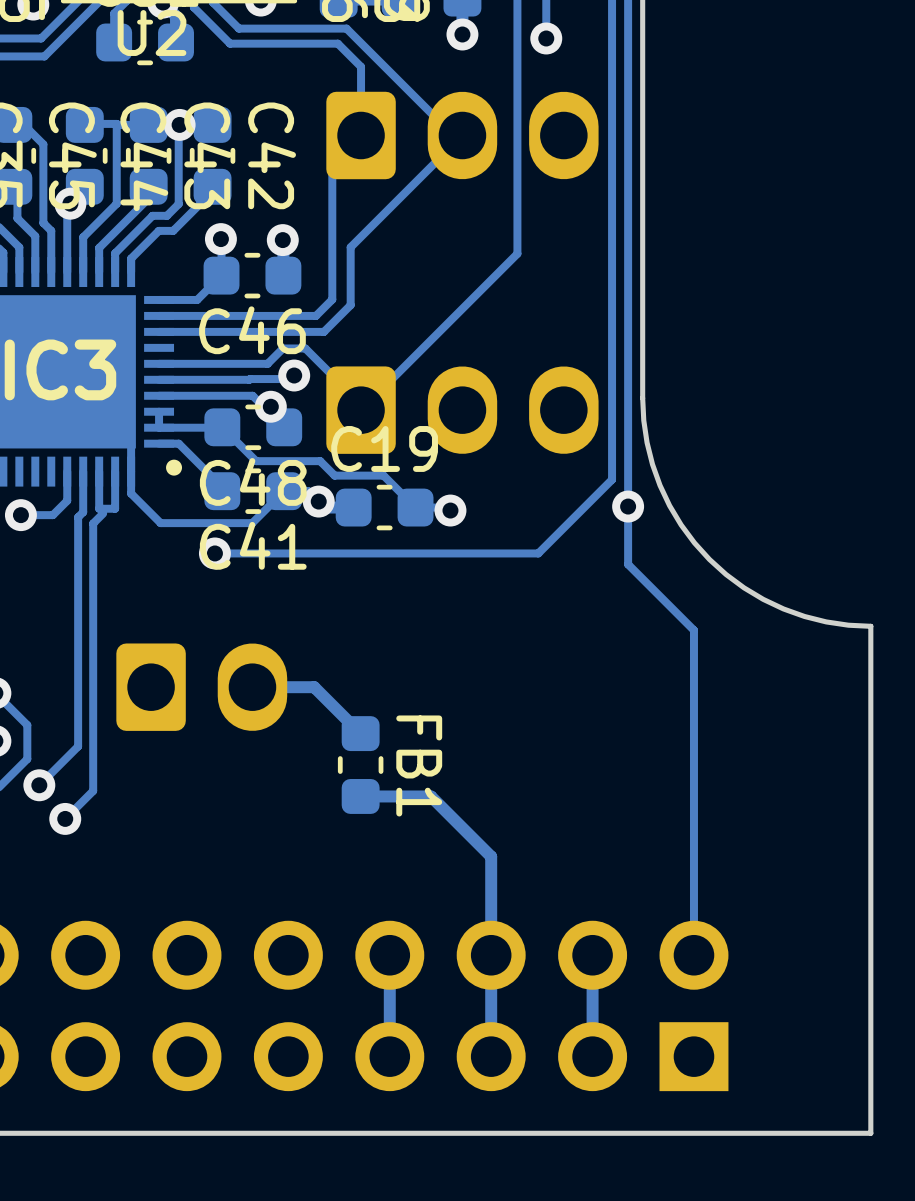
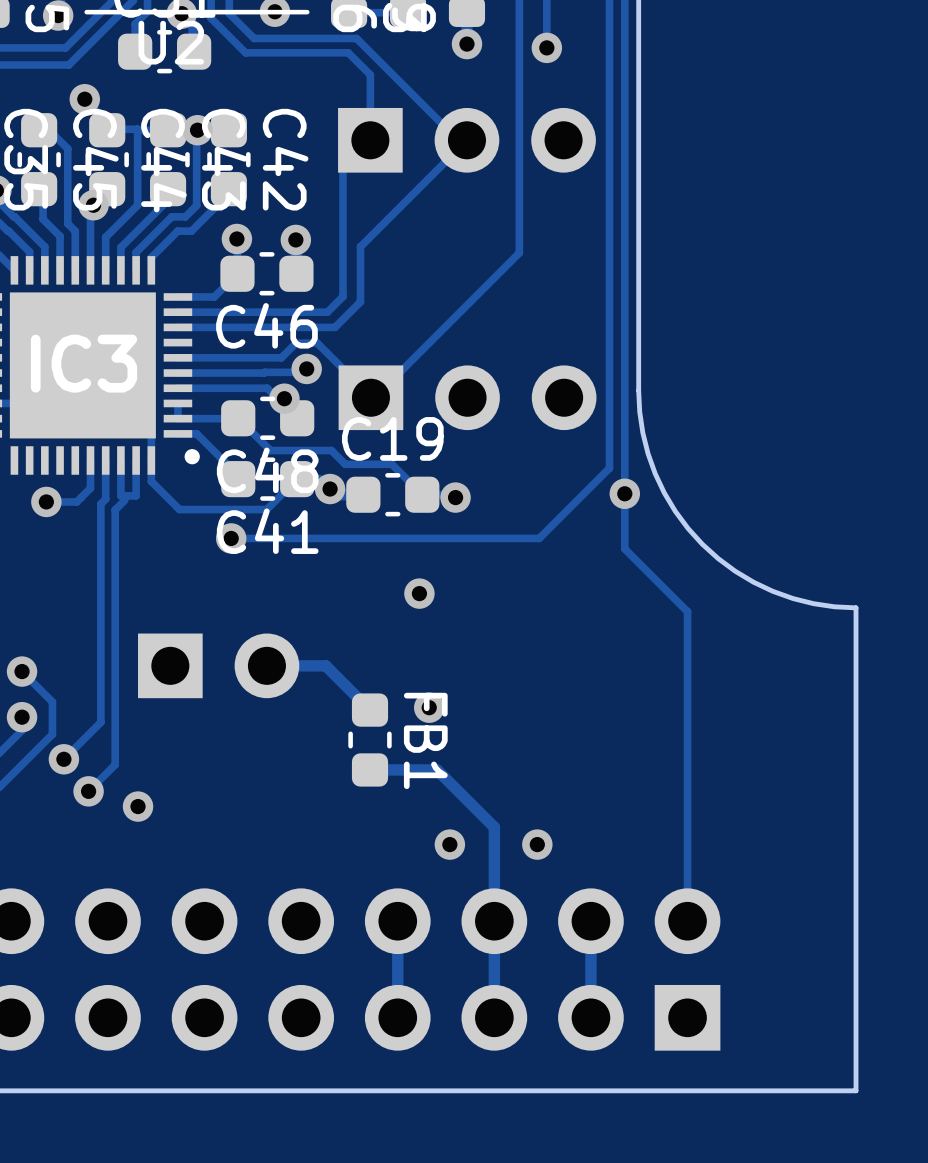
part footprint: [326, 91, 599, 180] -> [338, 107, 596, 173]
via: none -> (84, 99)
part footprint: [326, 366, 599, 454] -> [338, 365, 597, 431]
via: none -> (419, 593)
part footprint: [116, 643, 288, 731] -> [138, 633, 300, 699]
via: none -> (429, 707)
via: none -> (138, 806)
via: none -> (449, 844)
via: none -> (537, 844)

